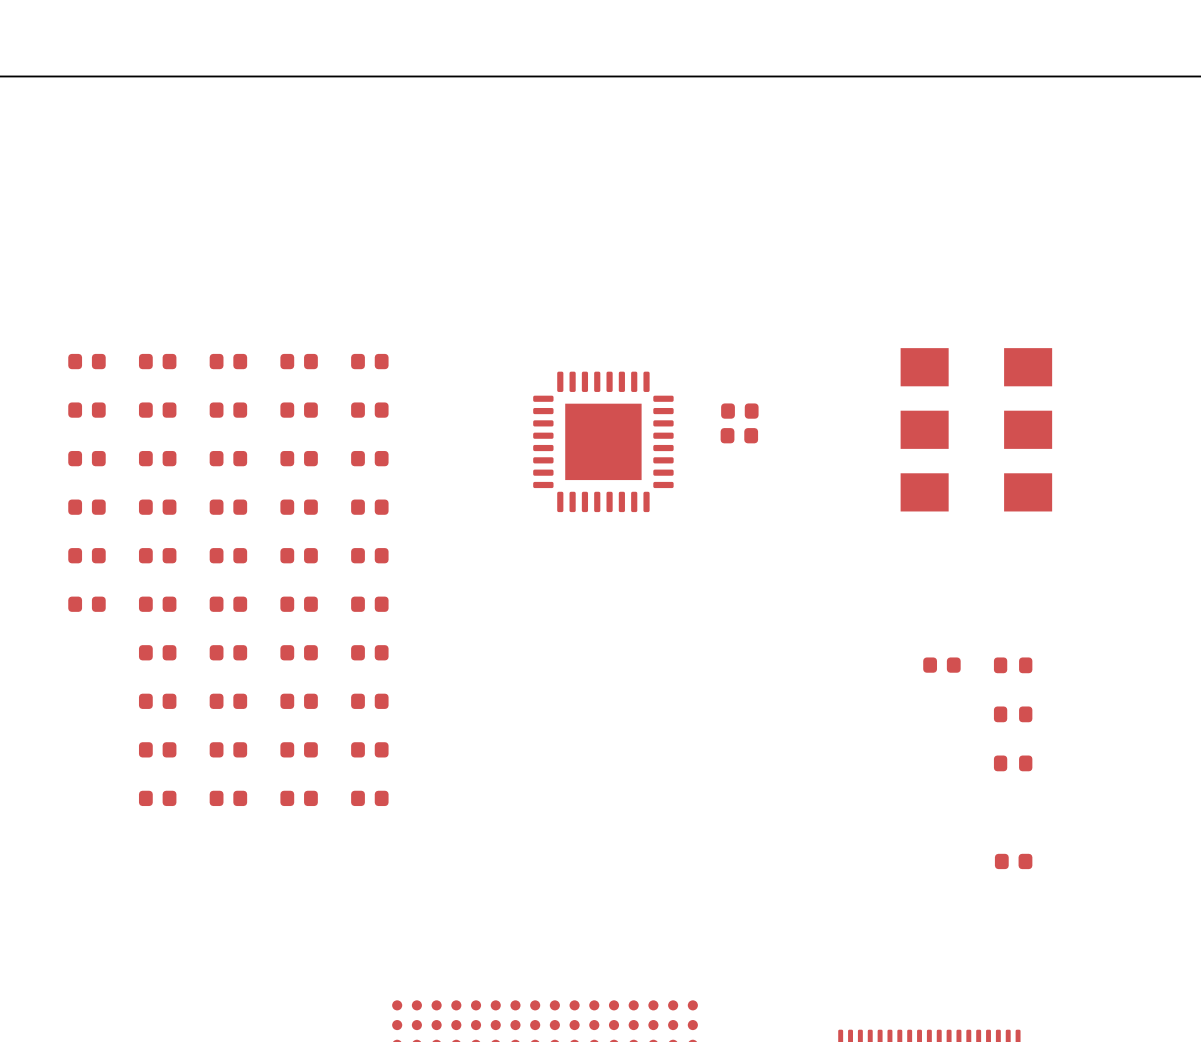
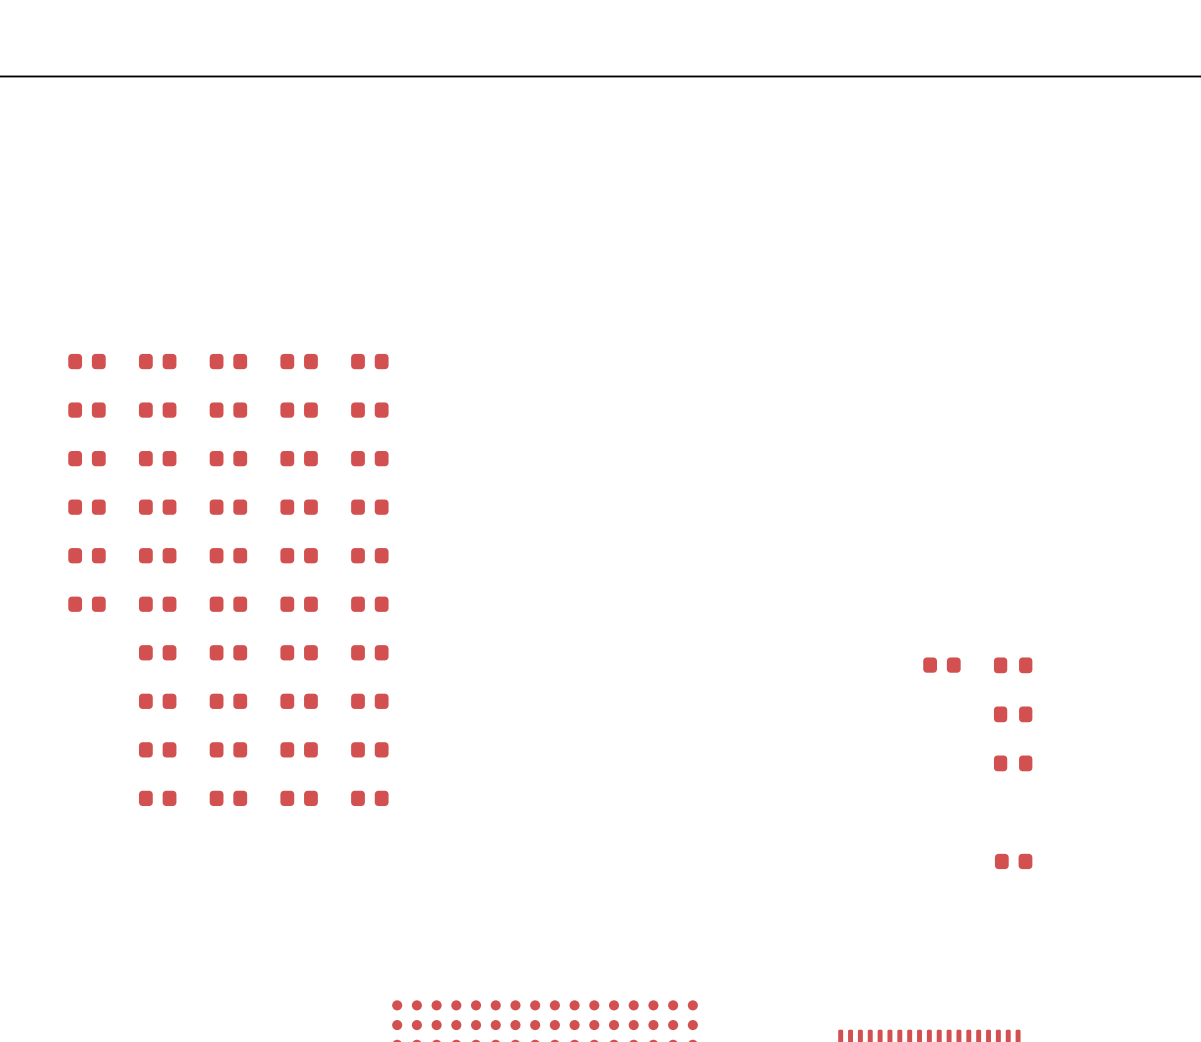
part: (739, 411) -> none
part: (976, 429) -> none
part: (739, 435) -> none
part: (603, 441) -> none

